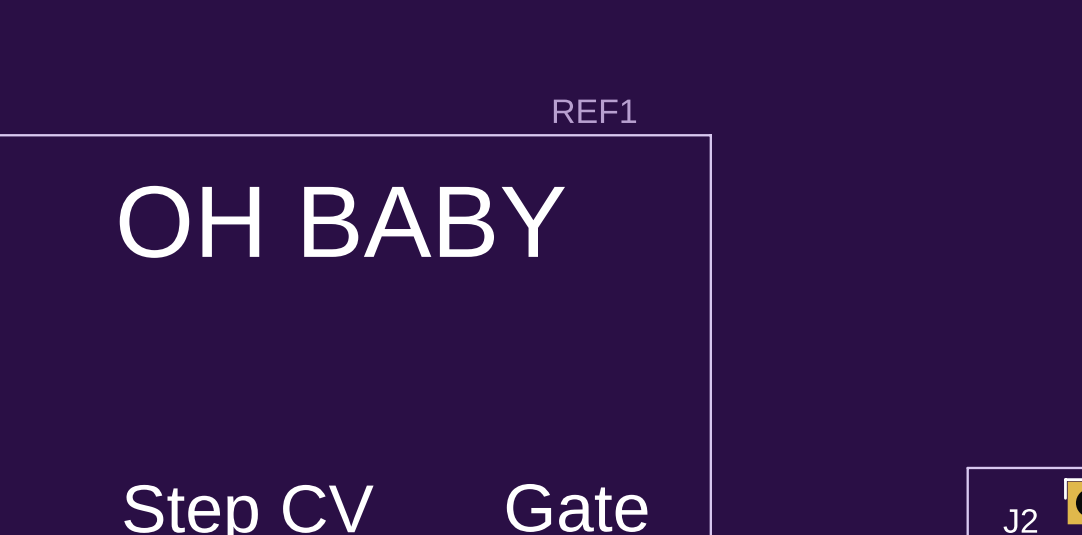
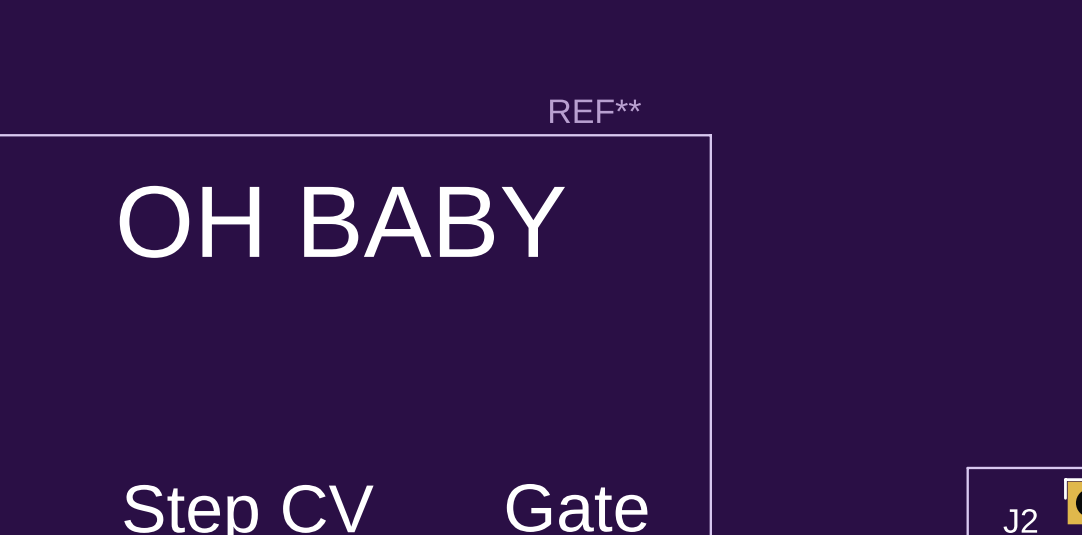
REF1 name: REF1 (594, 111) -> REF** (595, 111)

